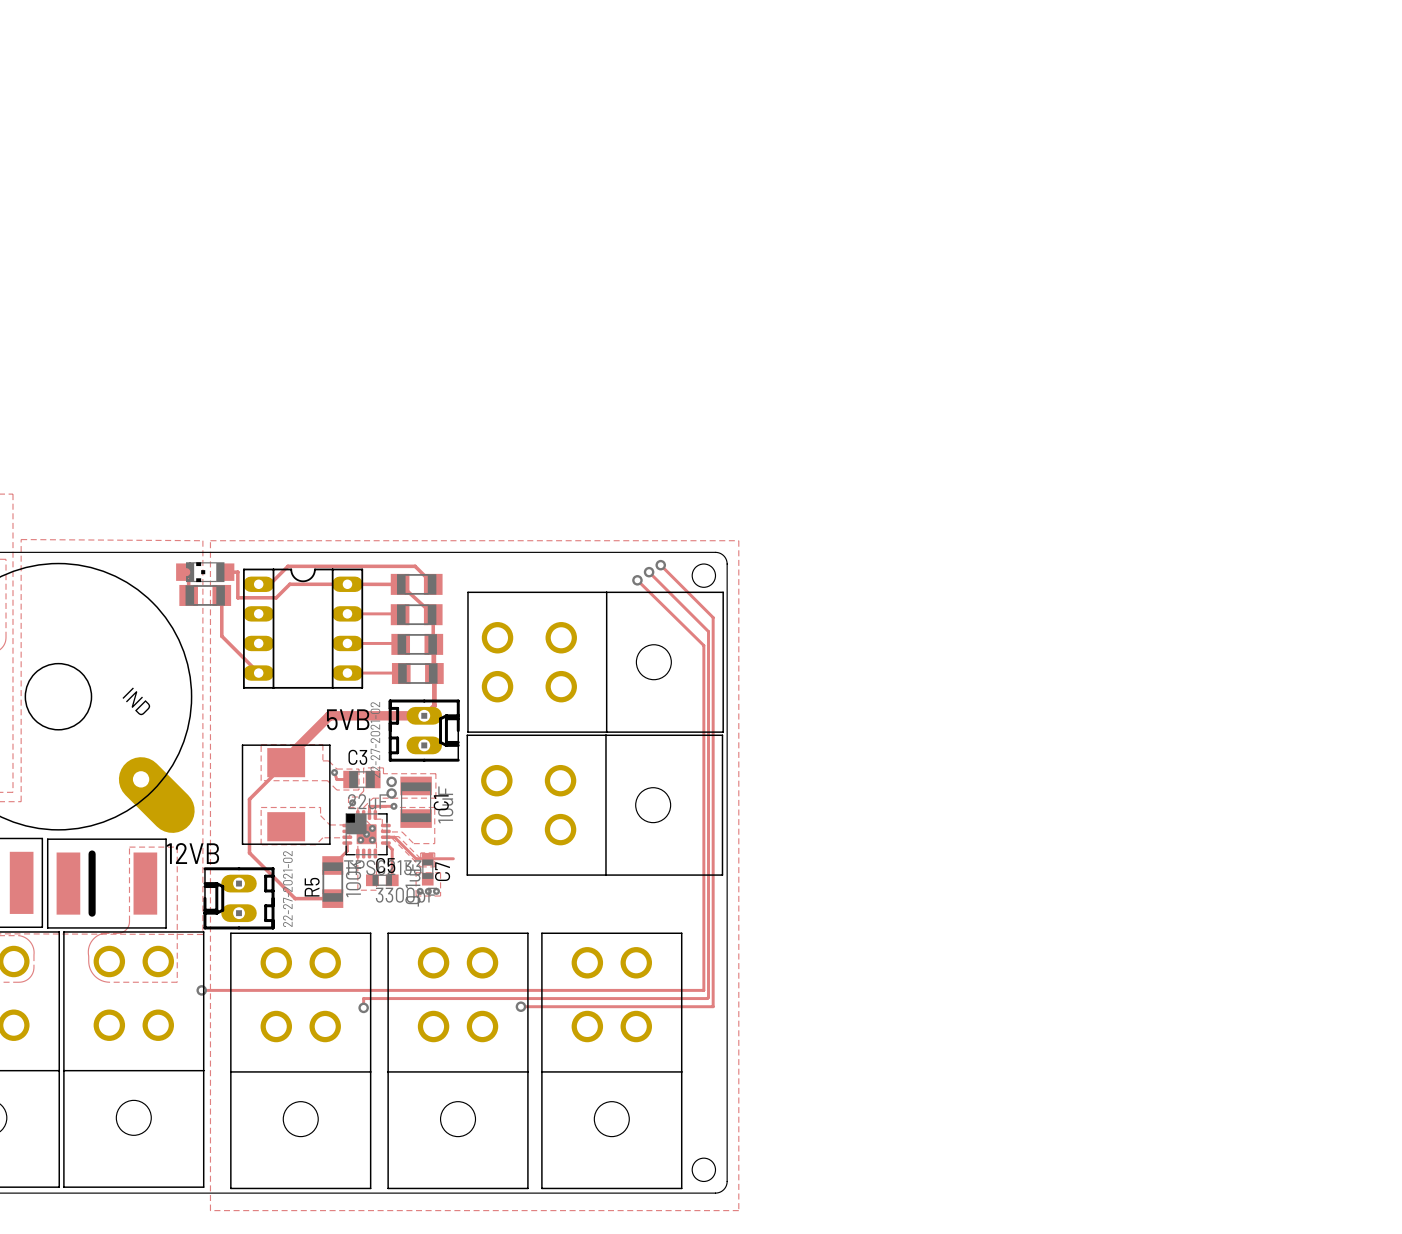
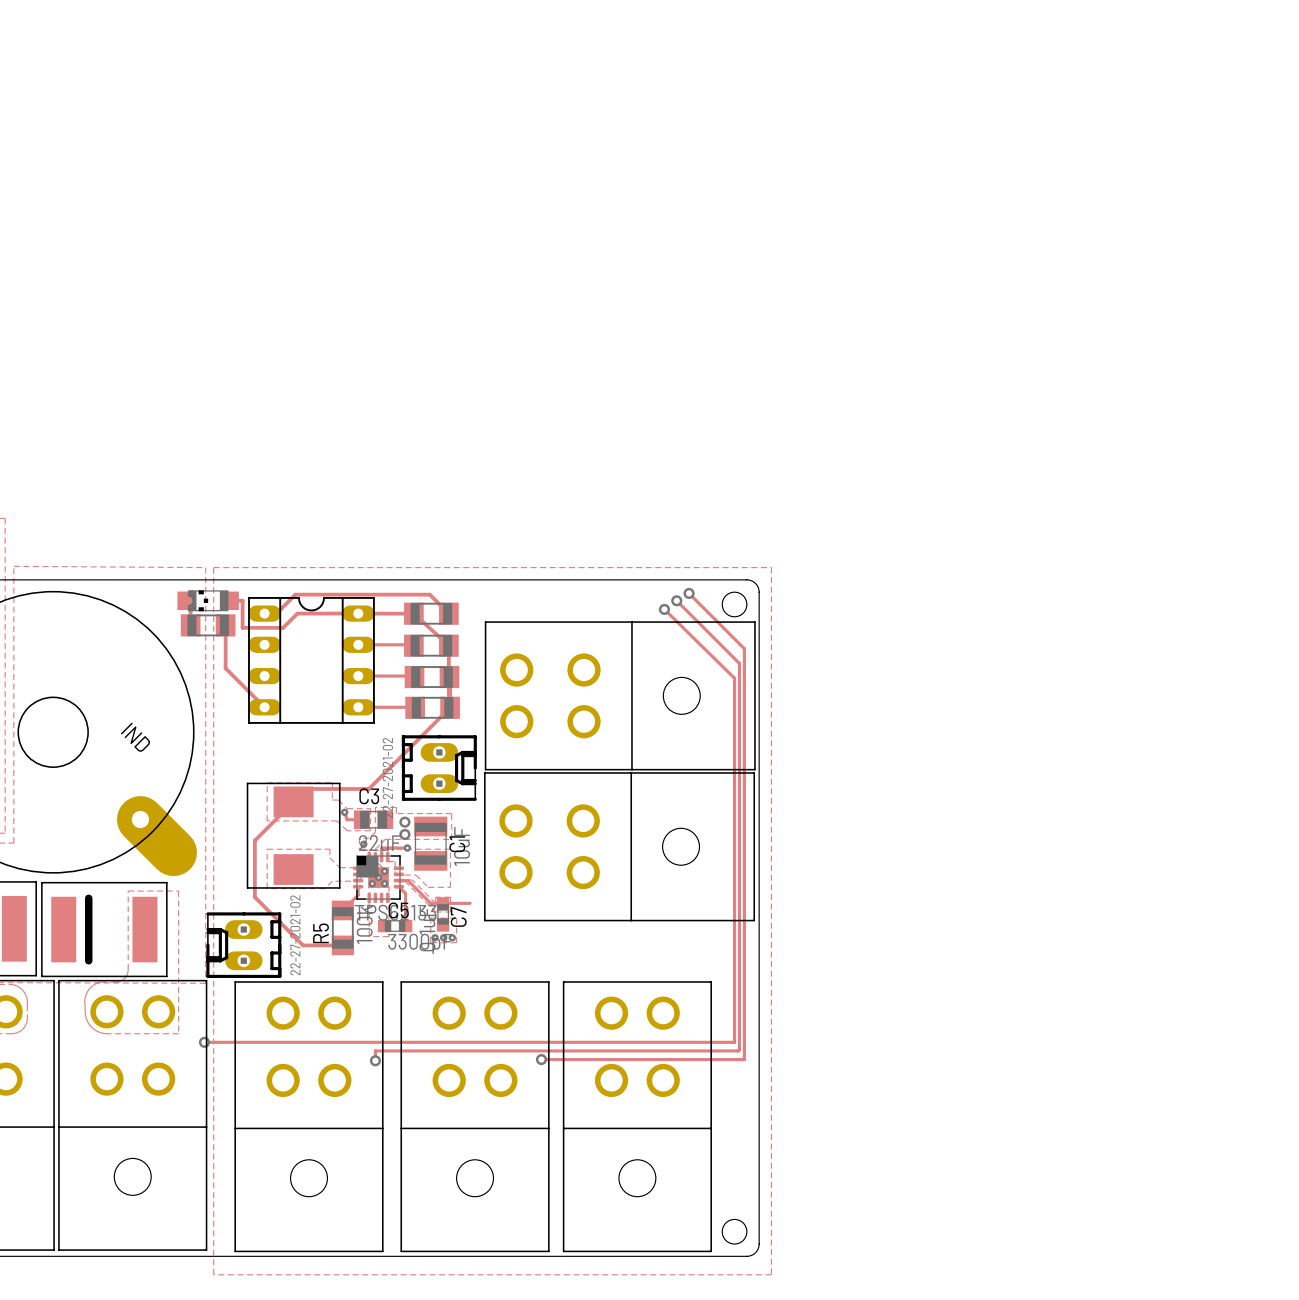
track: (434, 673) (434, 705) (424, 715) (329, 715) (294, 750) -> (450, 707) (368, 788) (302, 788)
text: 5VB (348, 719) -> none
text: 12VB (192, 853) -> none

